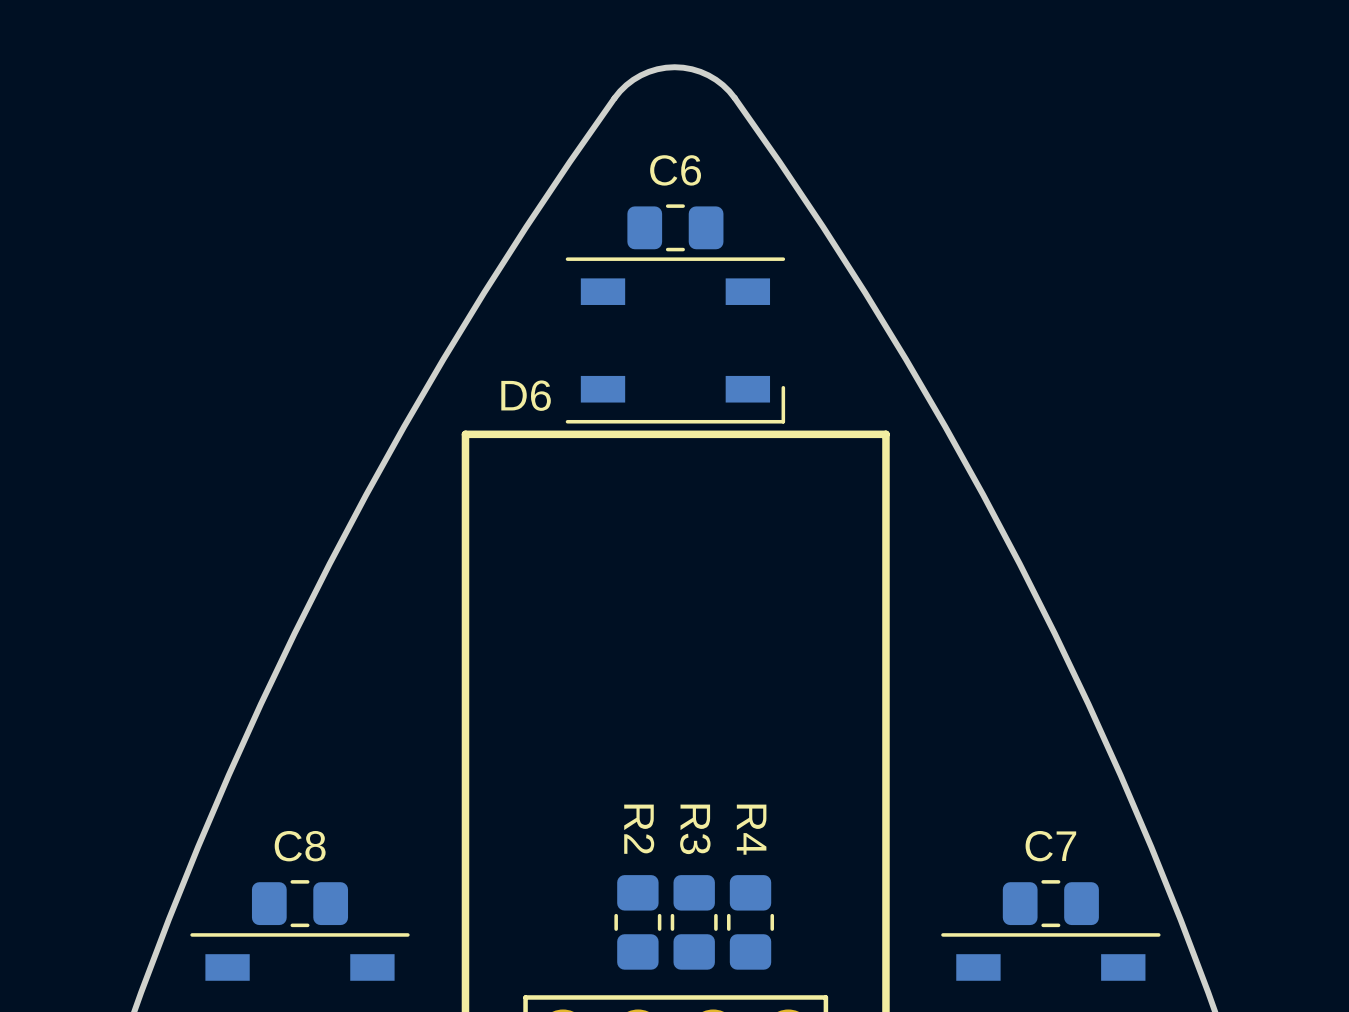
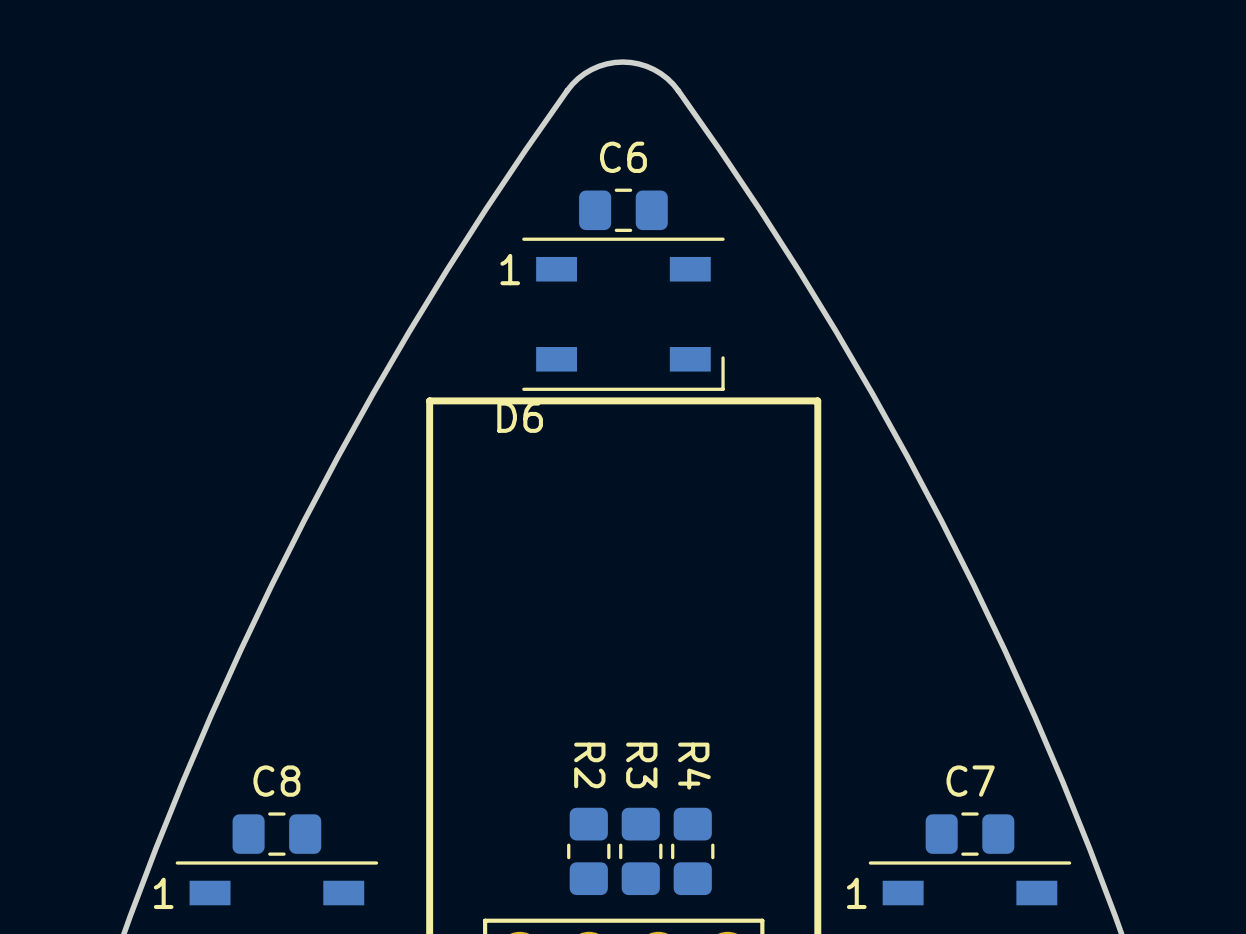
D6 text: none -> 1 (510, 269)
D6 name position: D6 (526, 395) -> D6 (520, 417)
part text: none -> 1 (163, 893)
part text: none -> 1 (856, 893)

